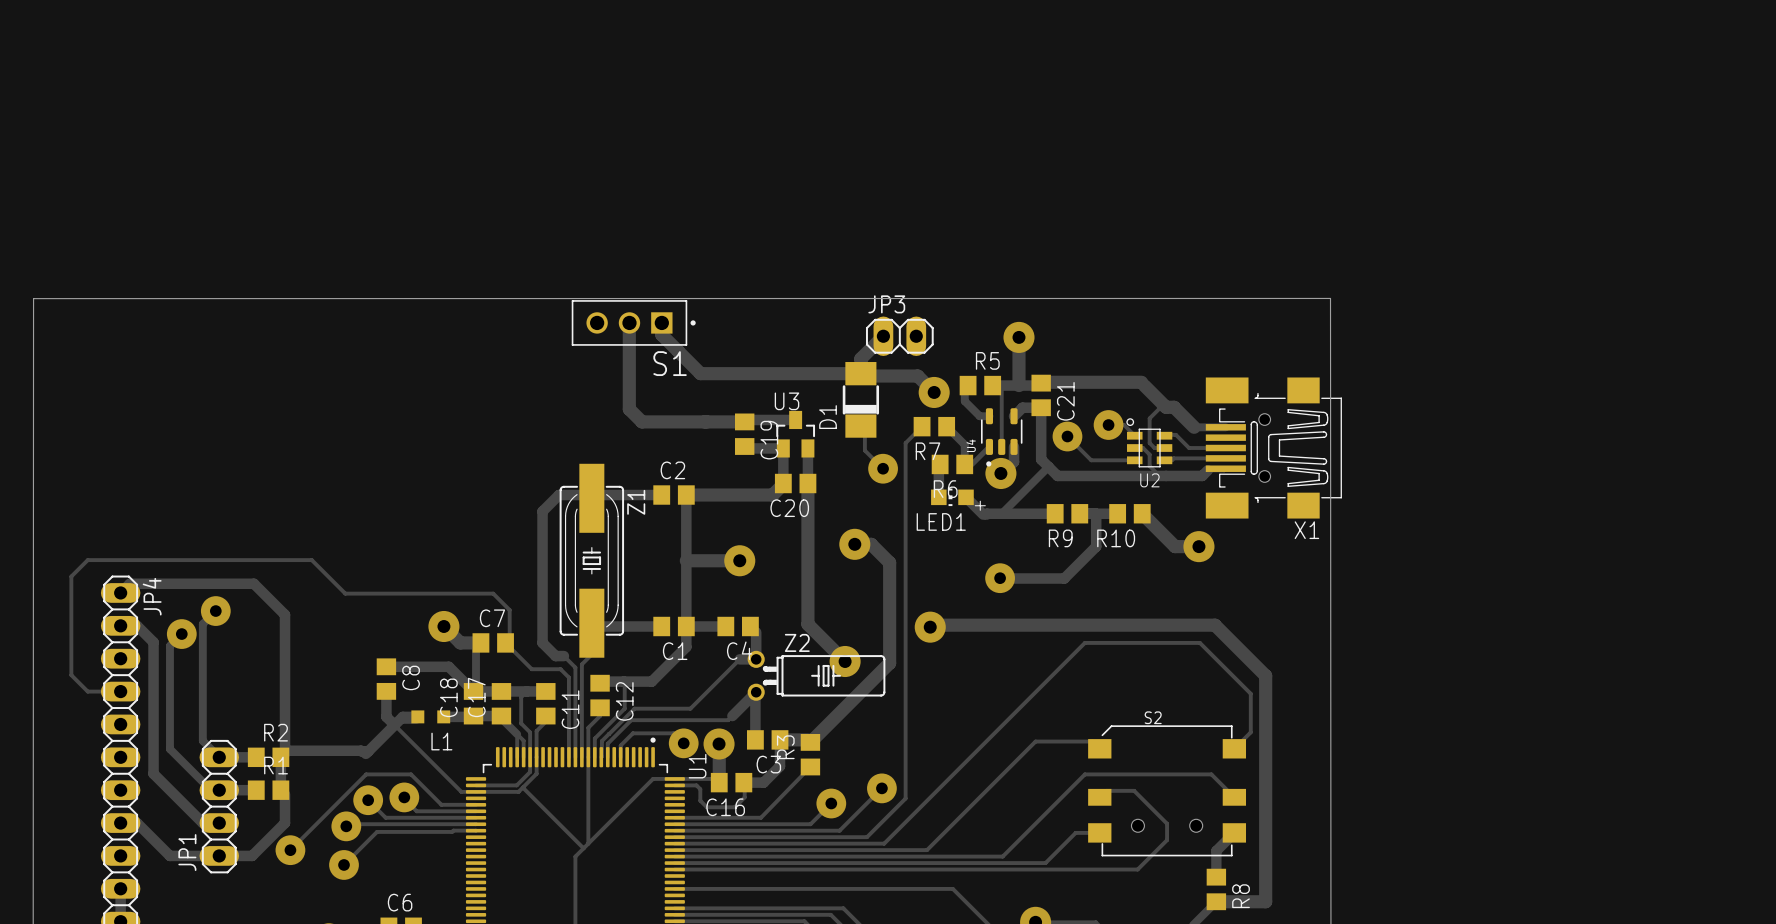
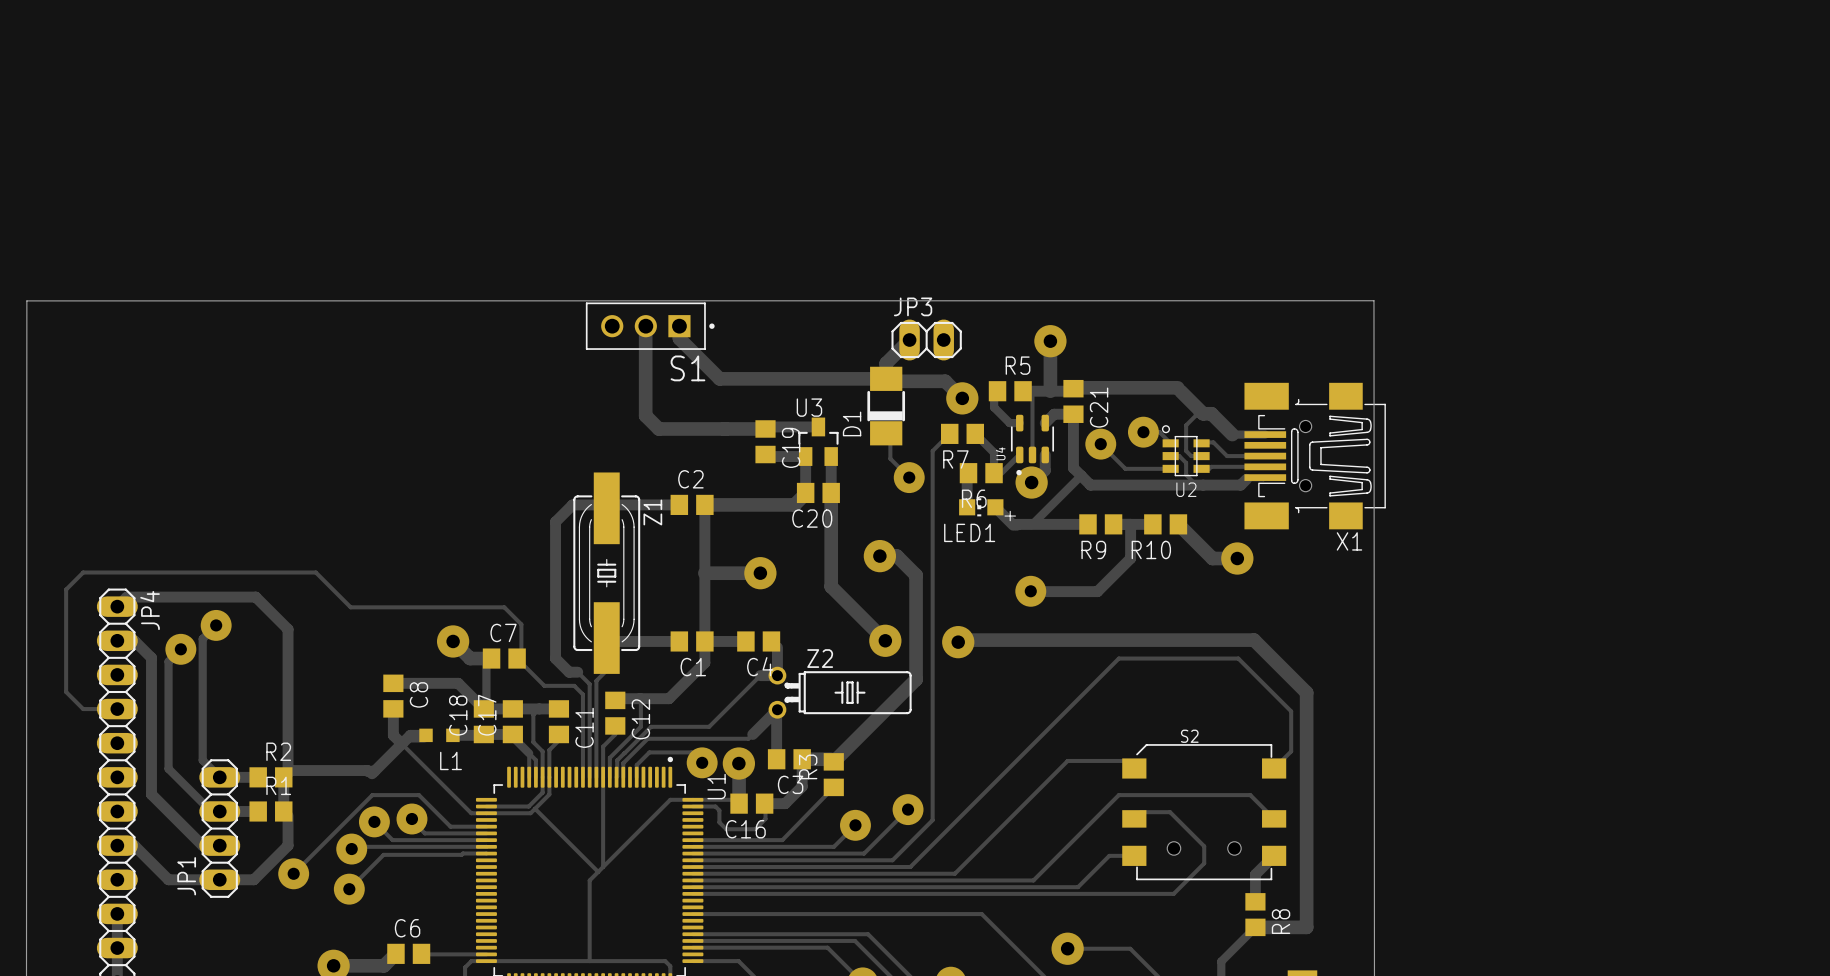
track: (807, 573) (807, 624) (845, 661) -> (831, 586) (885, 640)
via position: (845, 661) -> (885, 640)

